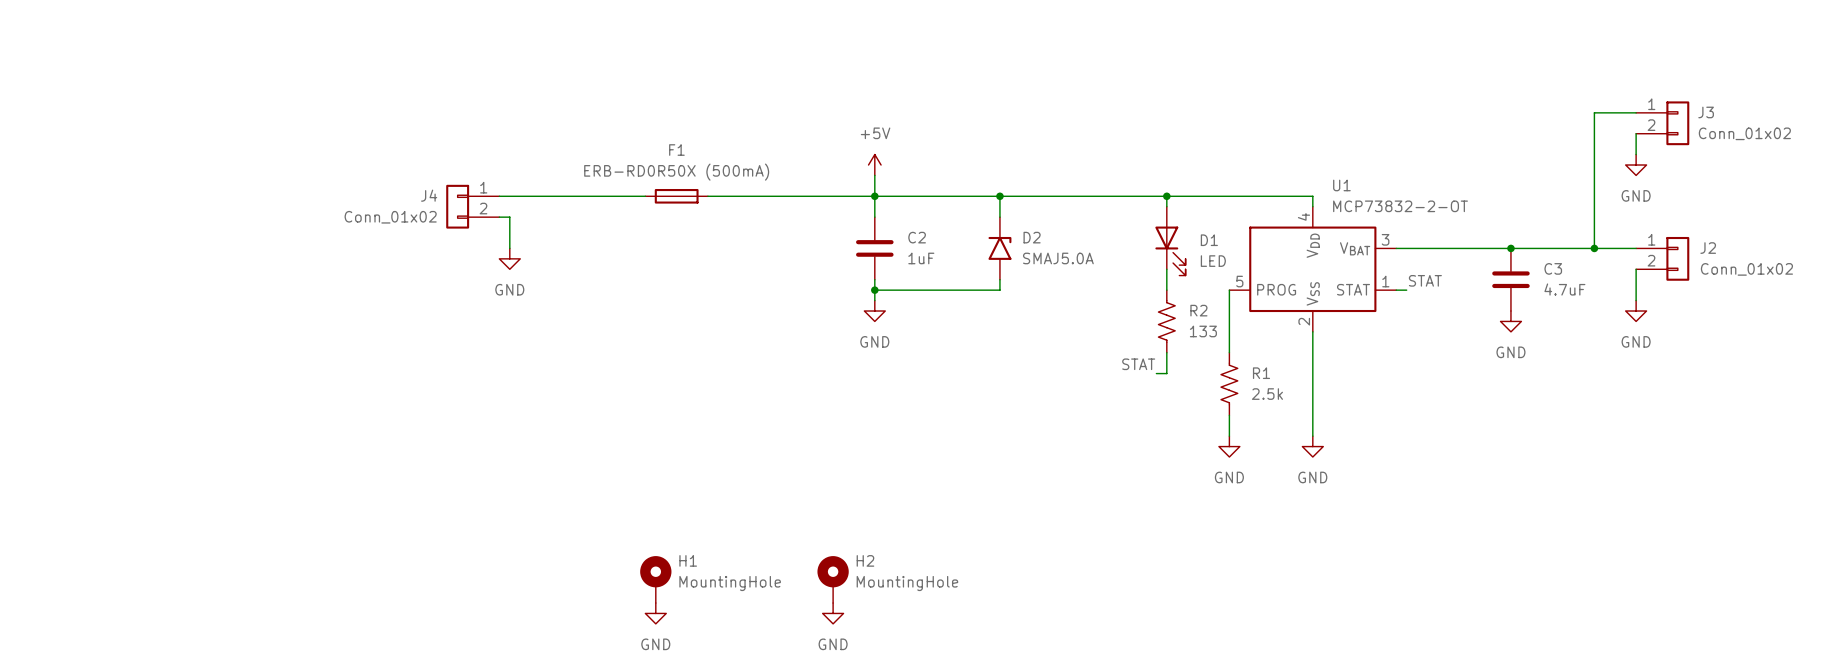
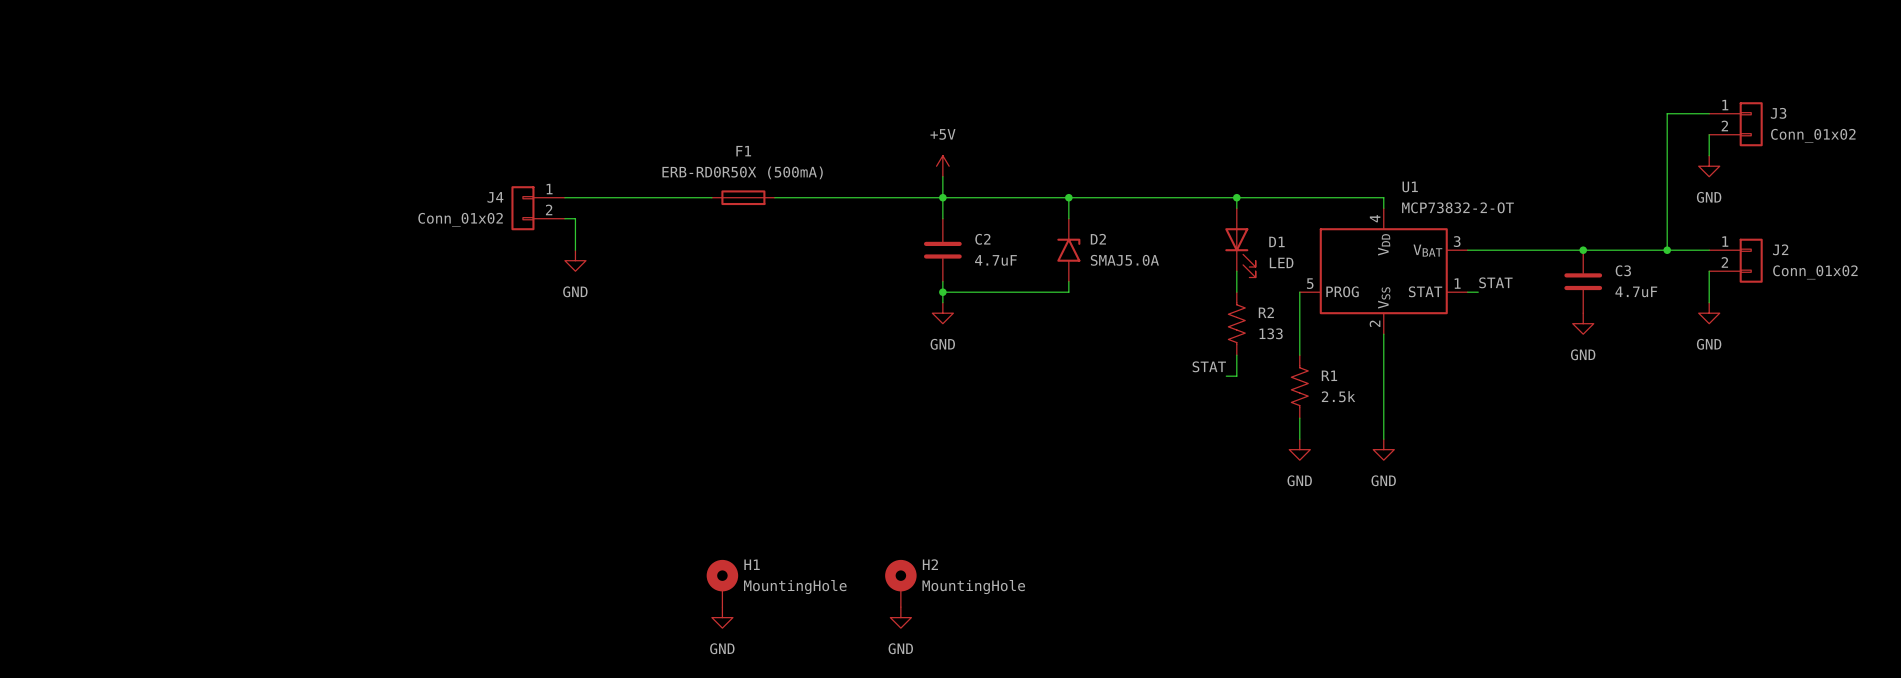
C2 value: 1uF (921, 258) -> 4.7uF (995, 260)

